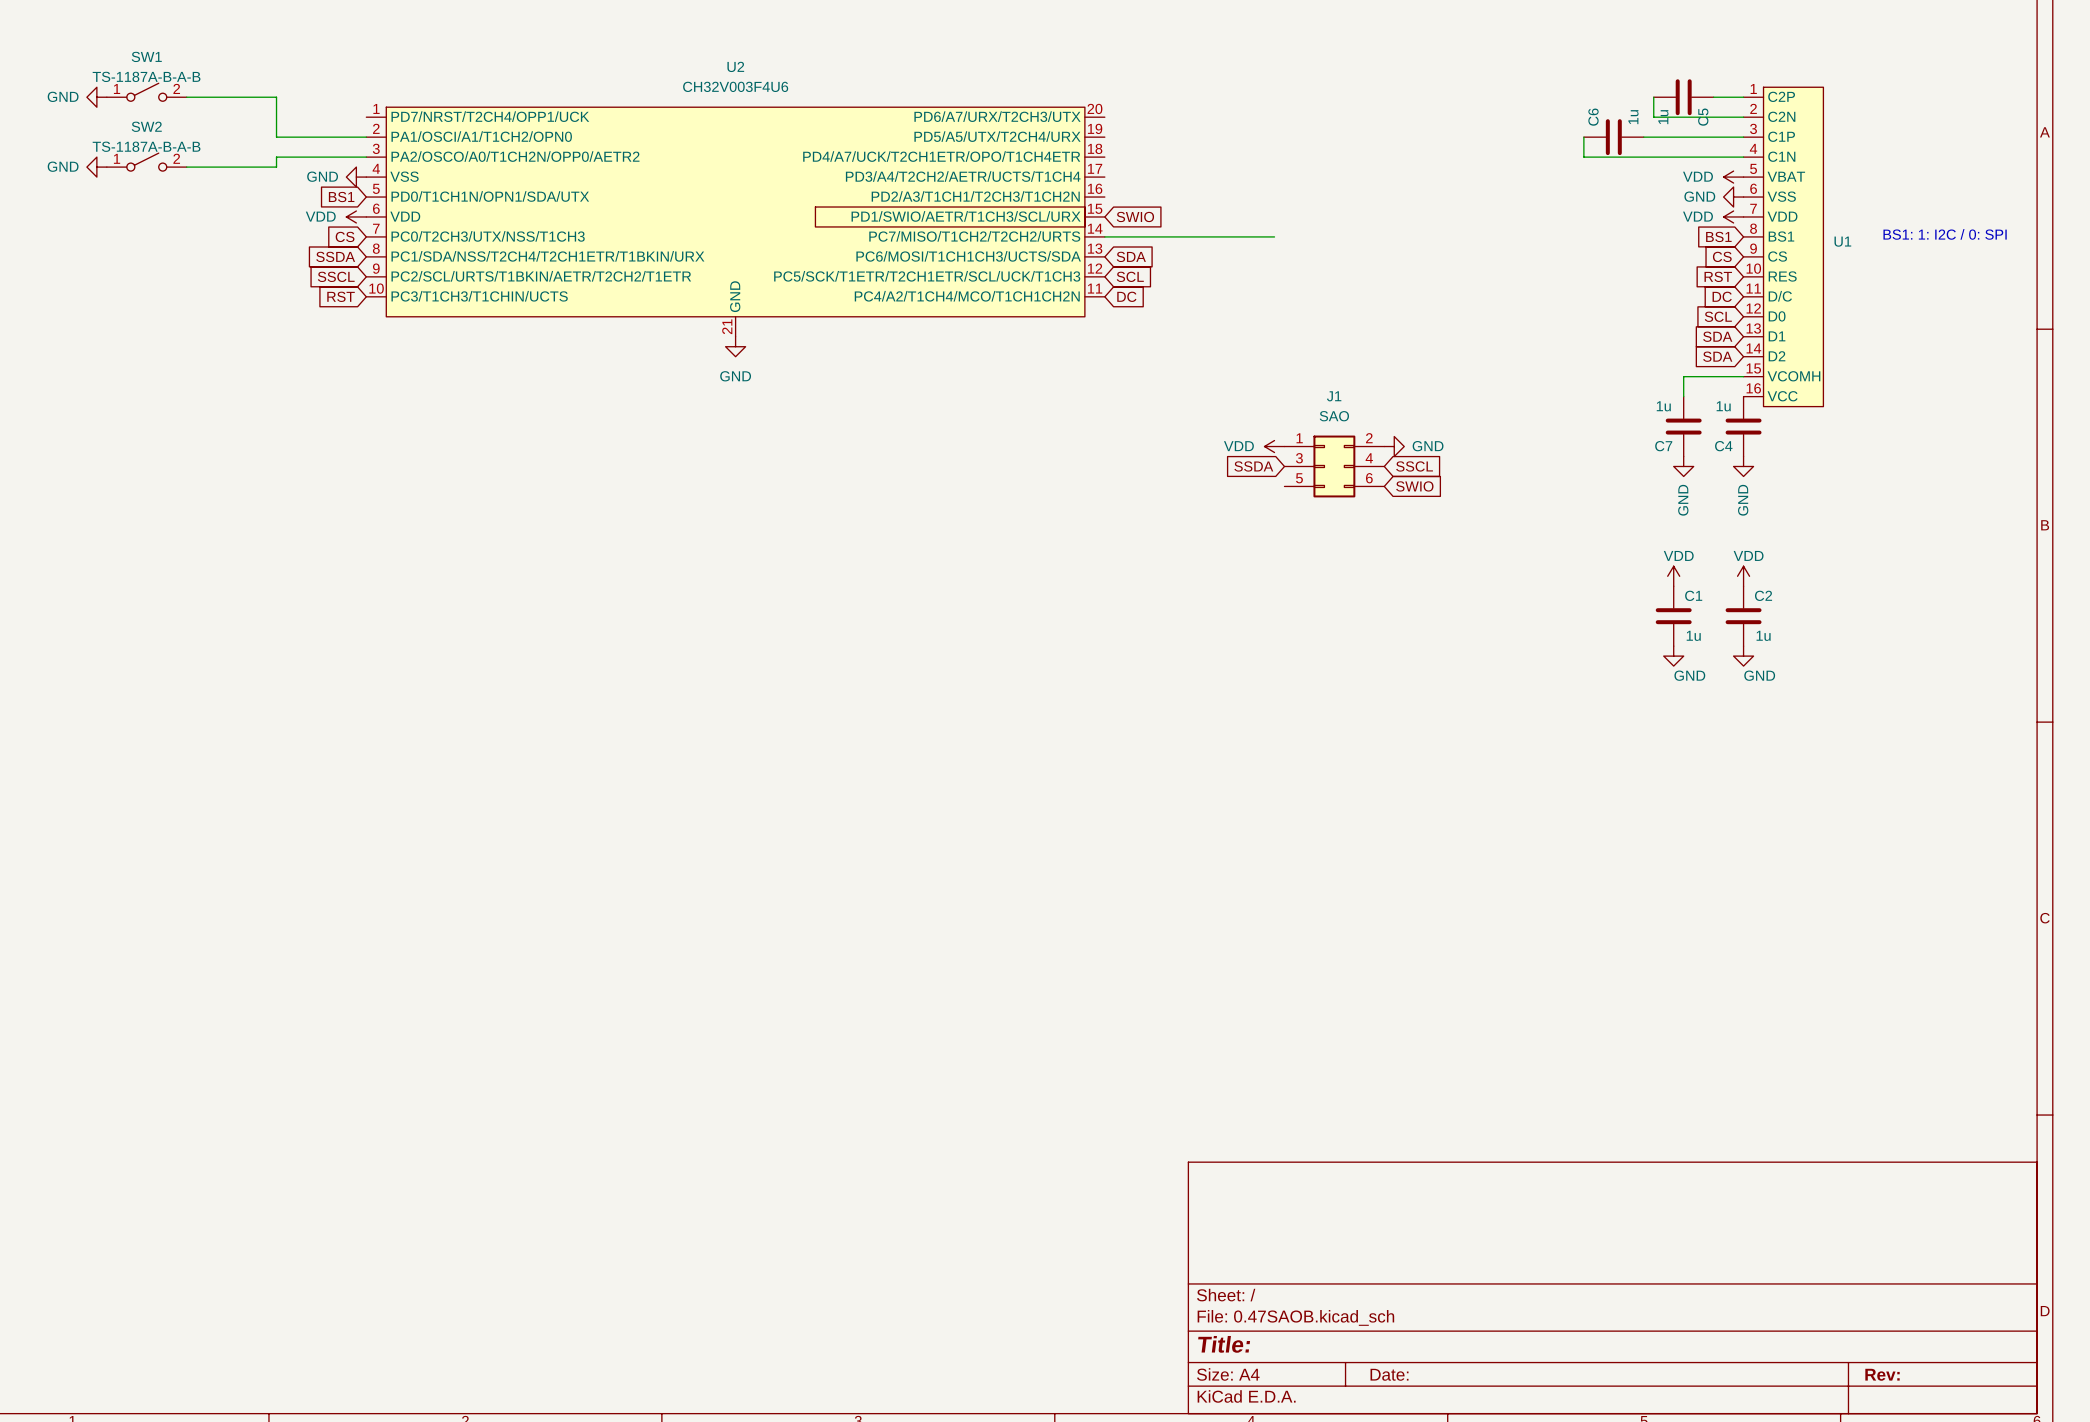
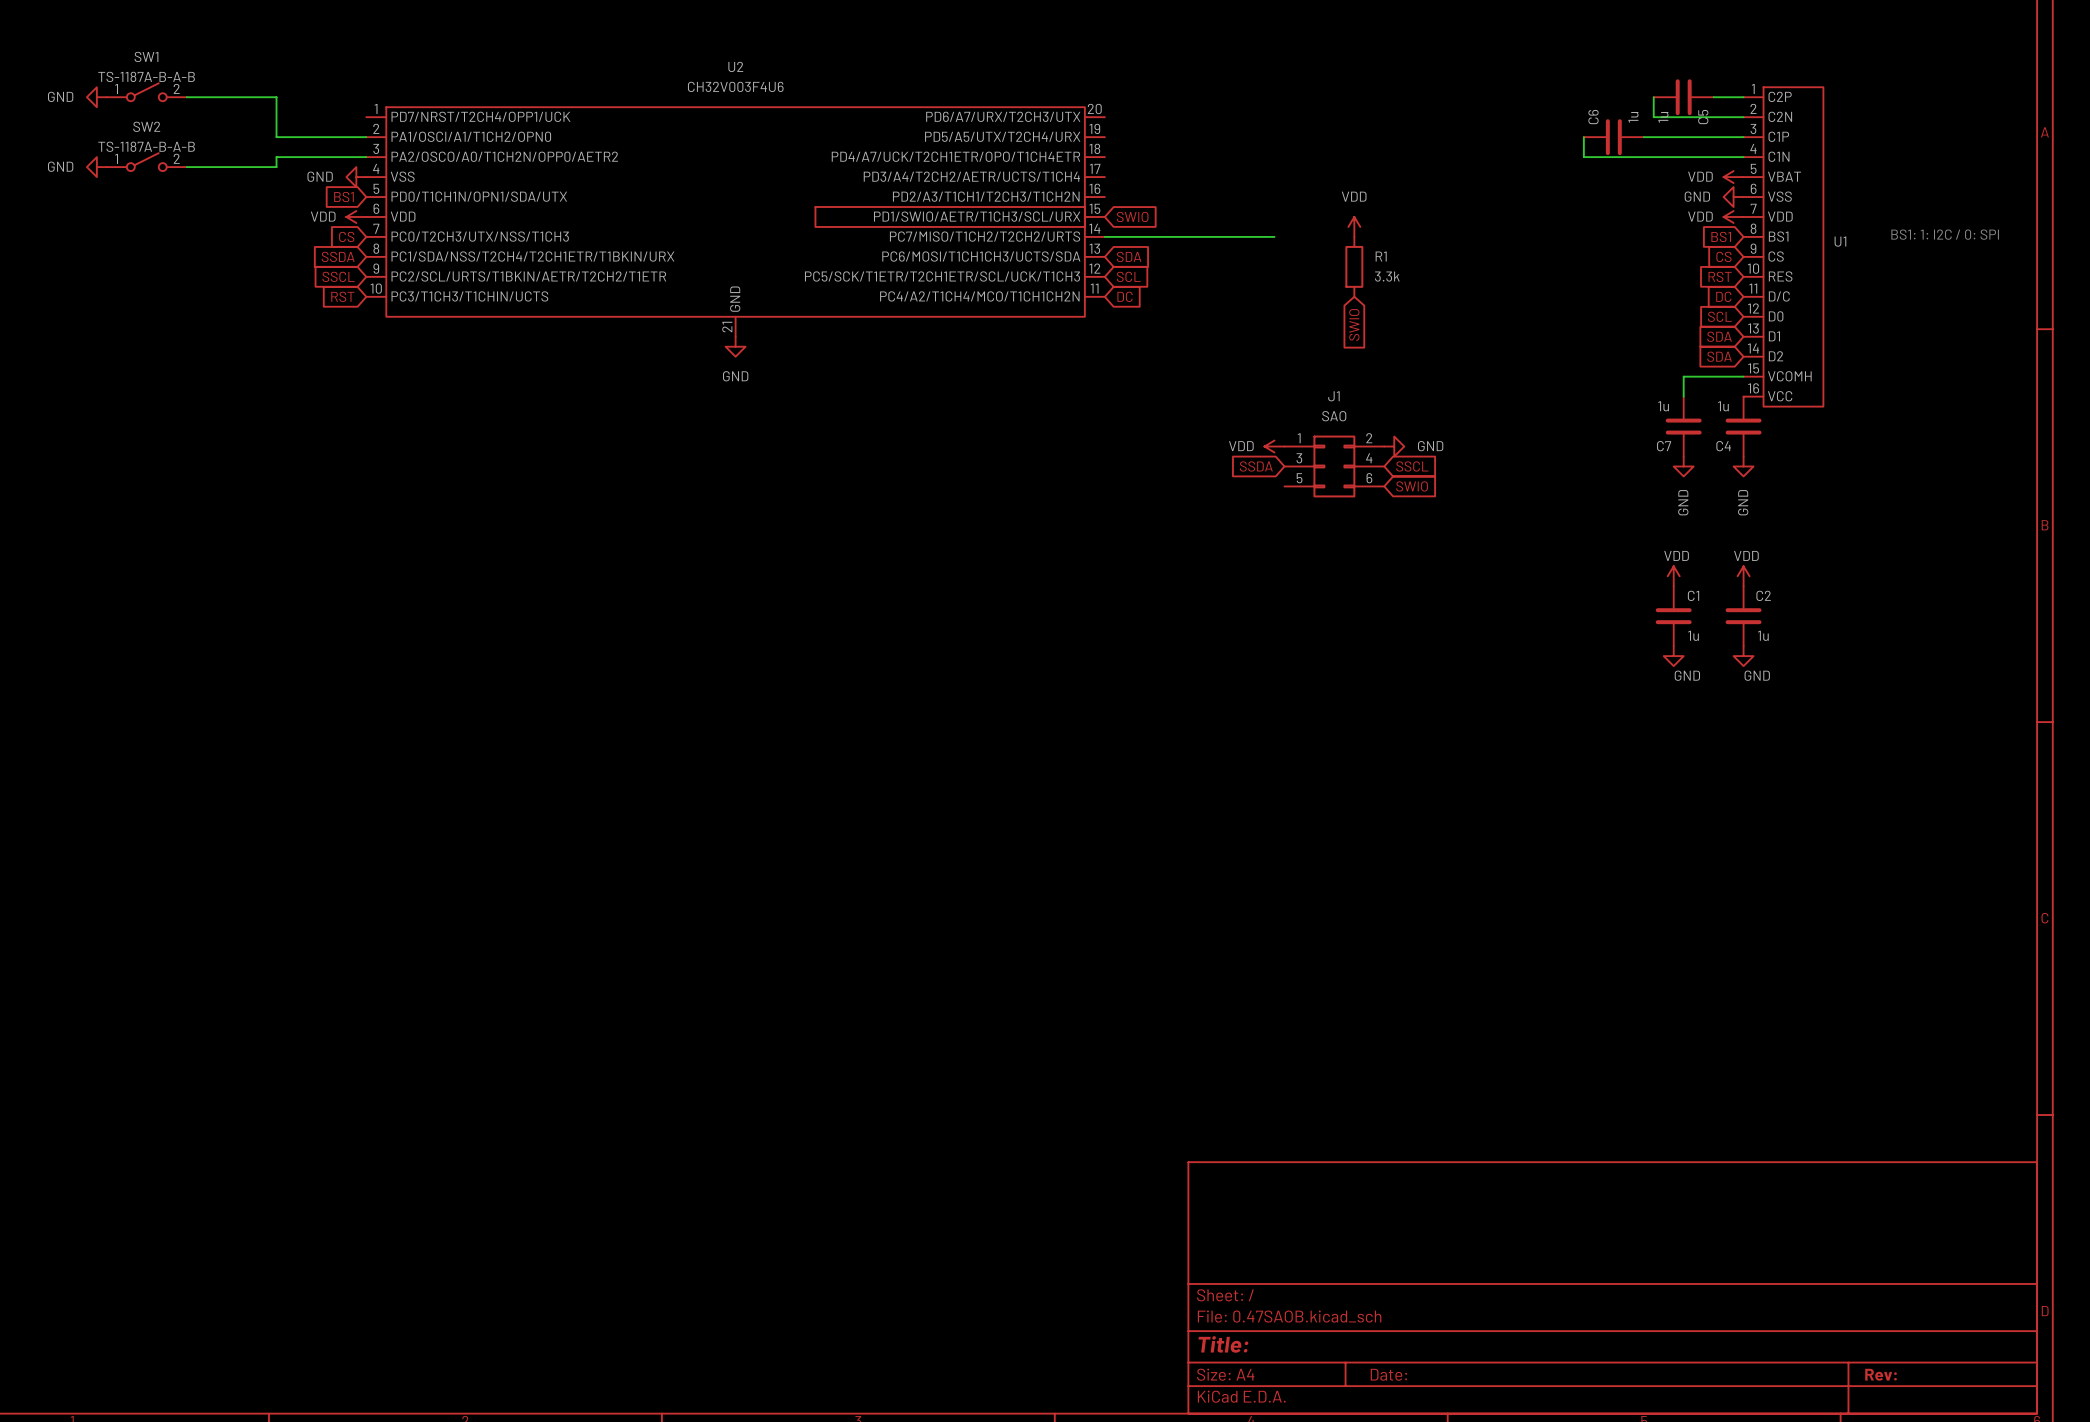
power symbol: none -> VDD (1354, 226)
R1: none -> 3.3k (1354, 266)
global label: none -> SWIO (1354, 324)

